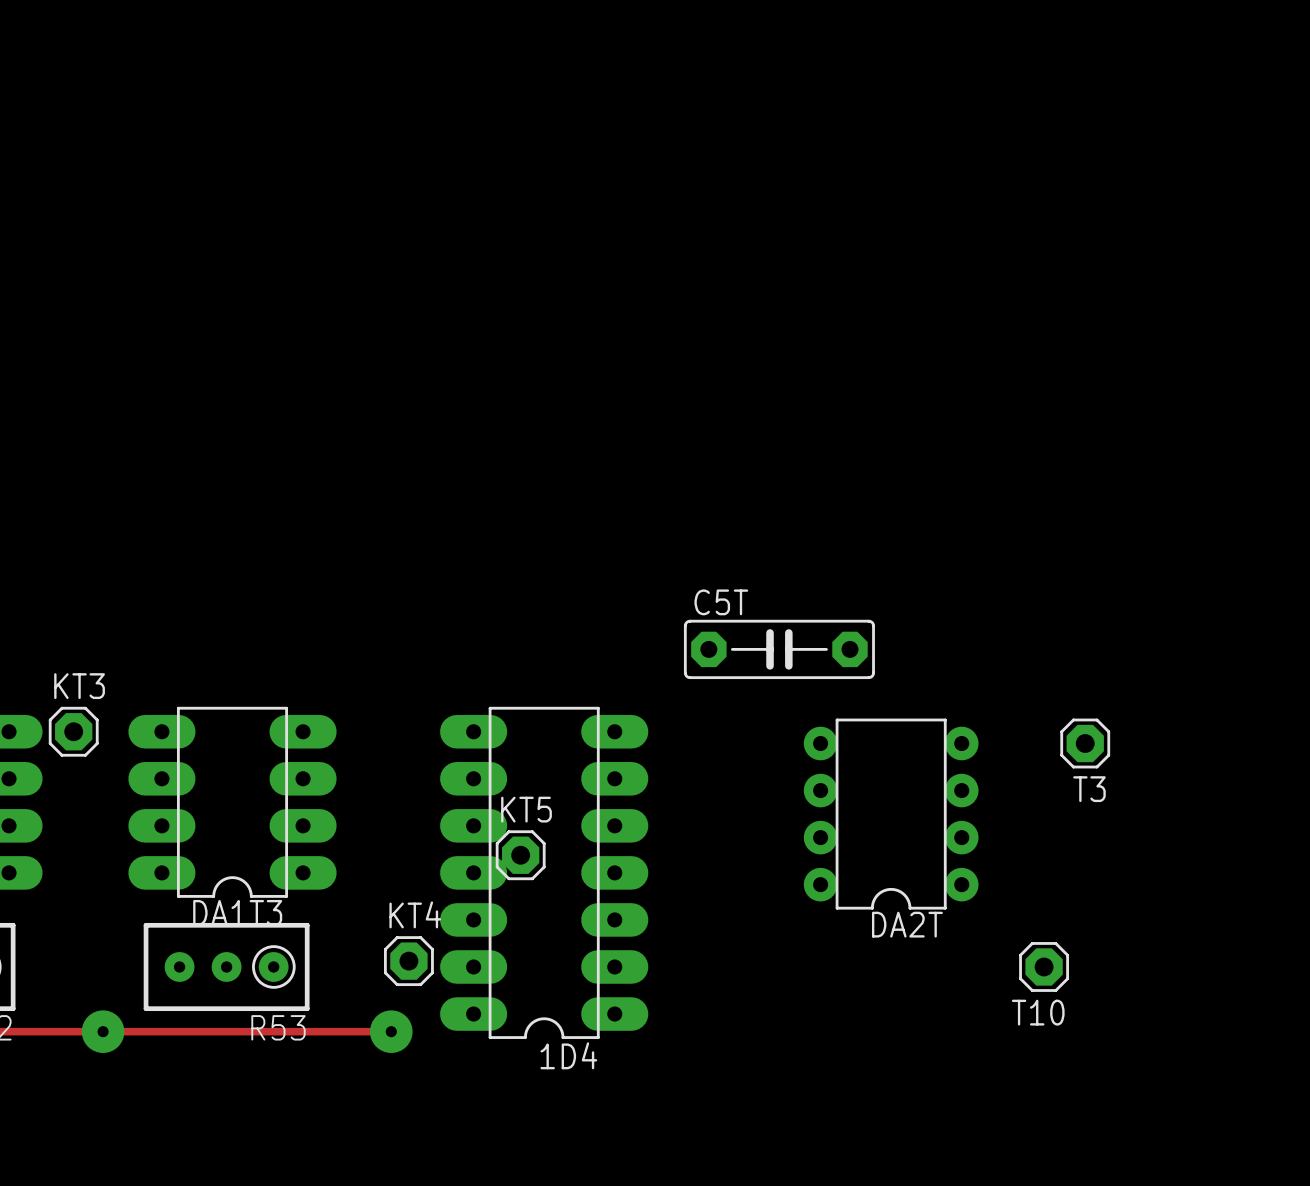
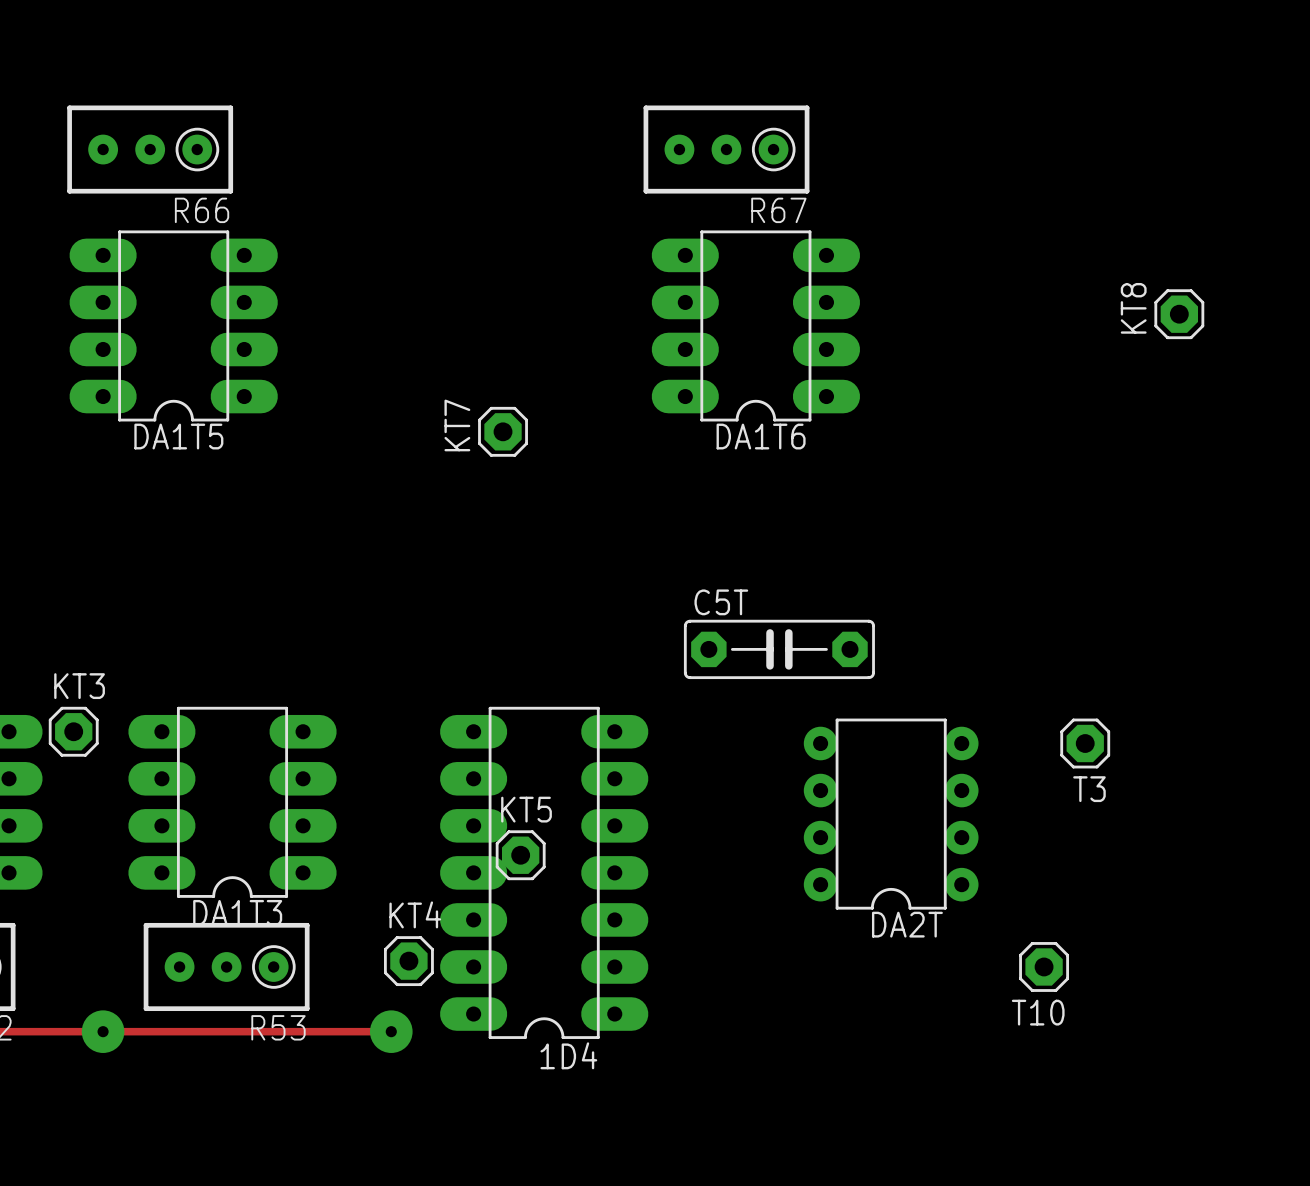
R66: none -> (150, 149)
R67: none -> (726, 149)
KT8: none -> (1179, 314)
DA1T5: none -> (173, 325)
DA1T6: none -> (755, 325)
KT7: none -> (503, 431)

